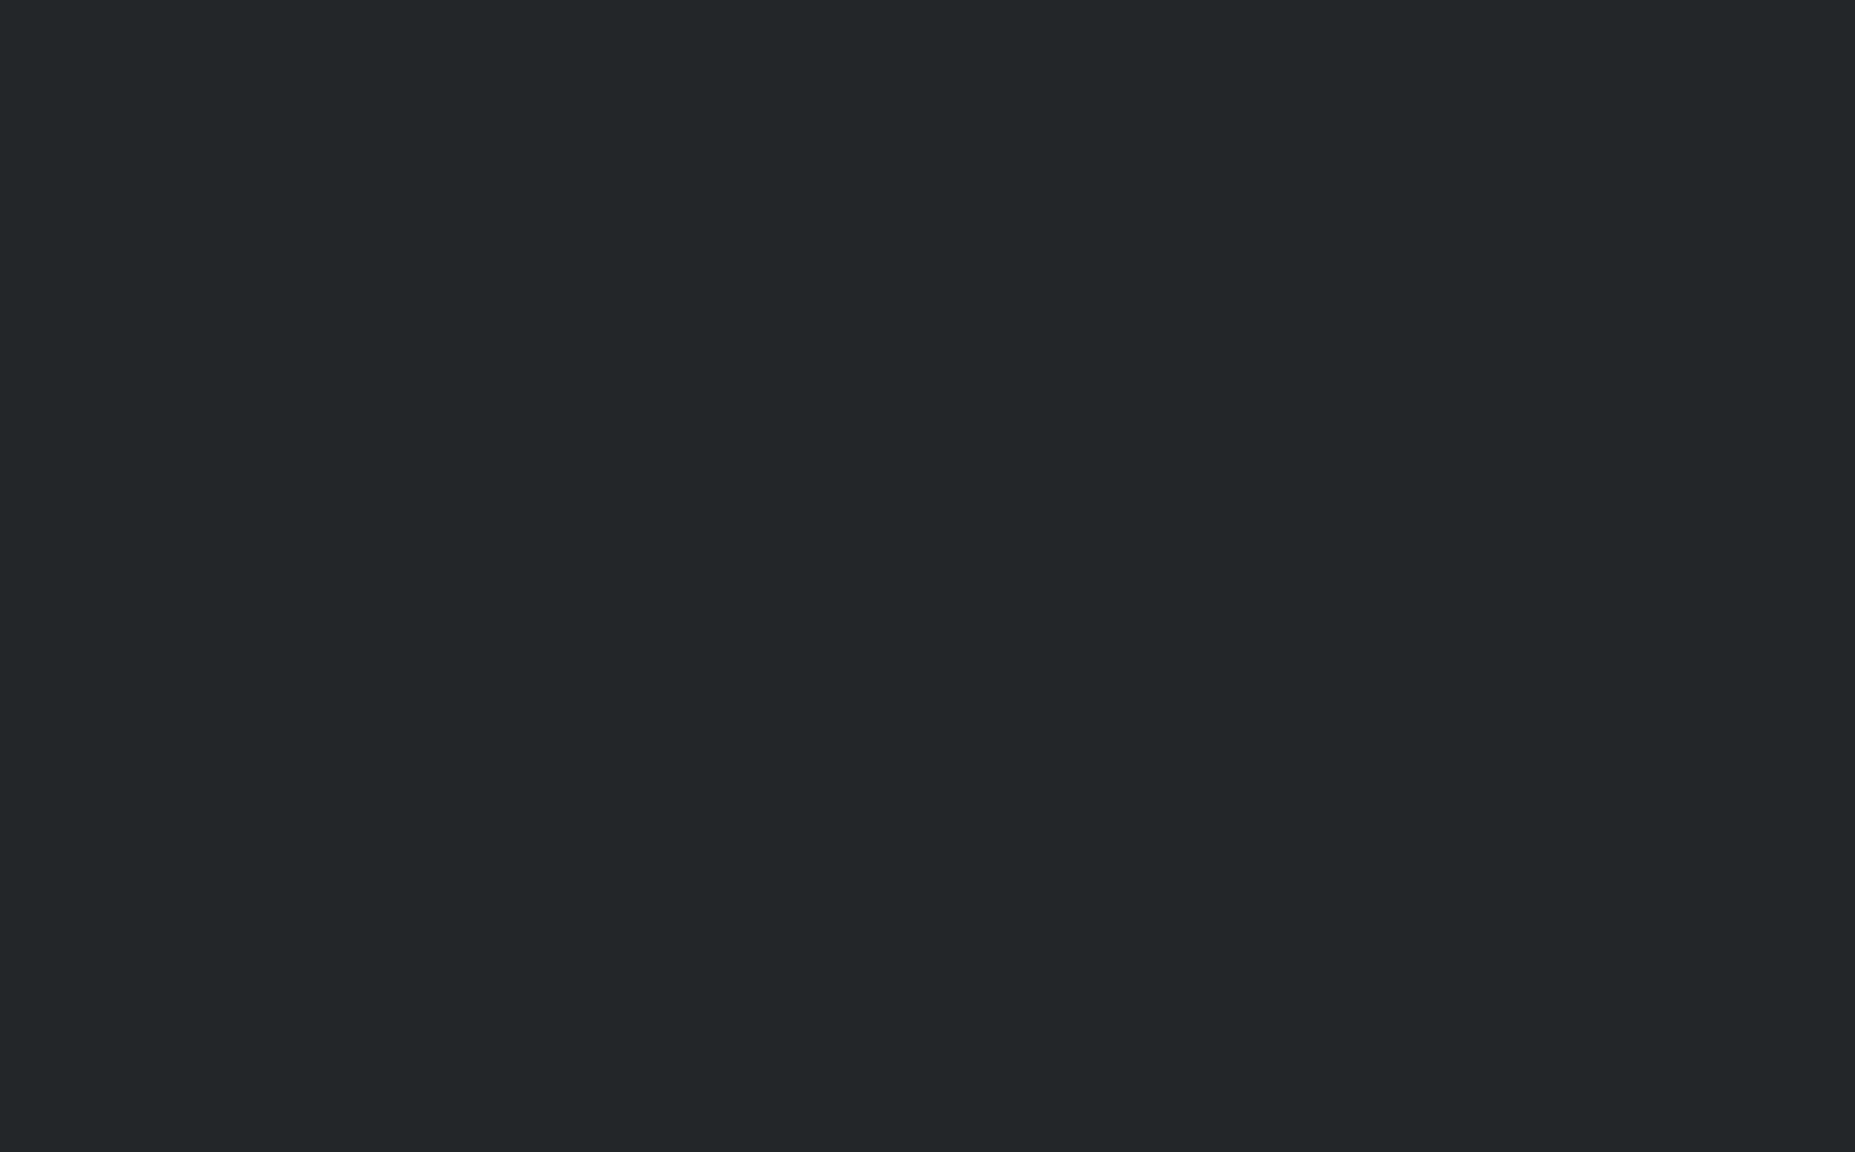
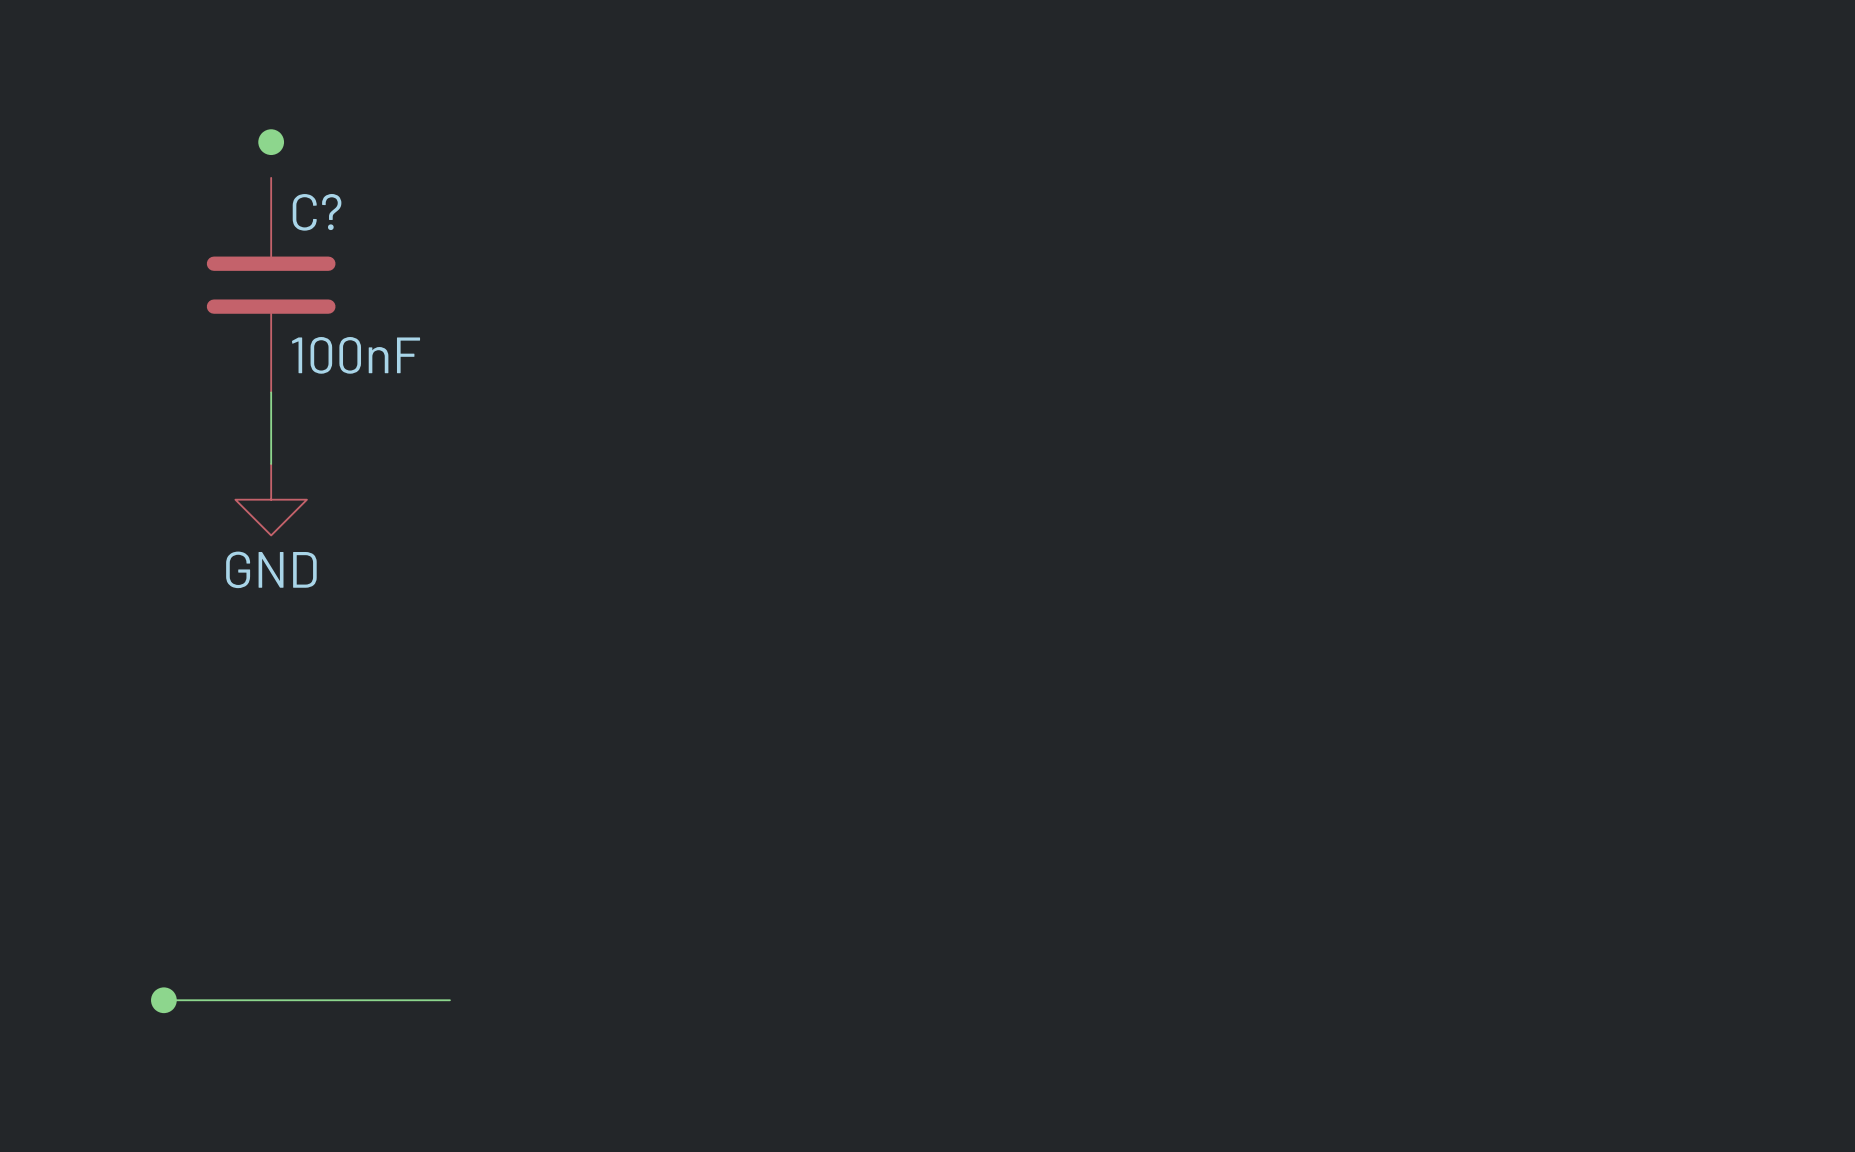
junction: none -> (271, 142)
C?: none -> 100nF (271, 285)
wire: none -> (271, 392) (271, 463)
power symbol: none -> GND (271, 499)
wire: none -> (163, 1000) (449, 1000)
junction: none -> (163, 1000)

